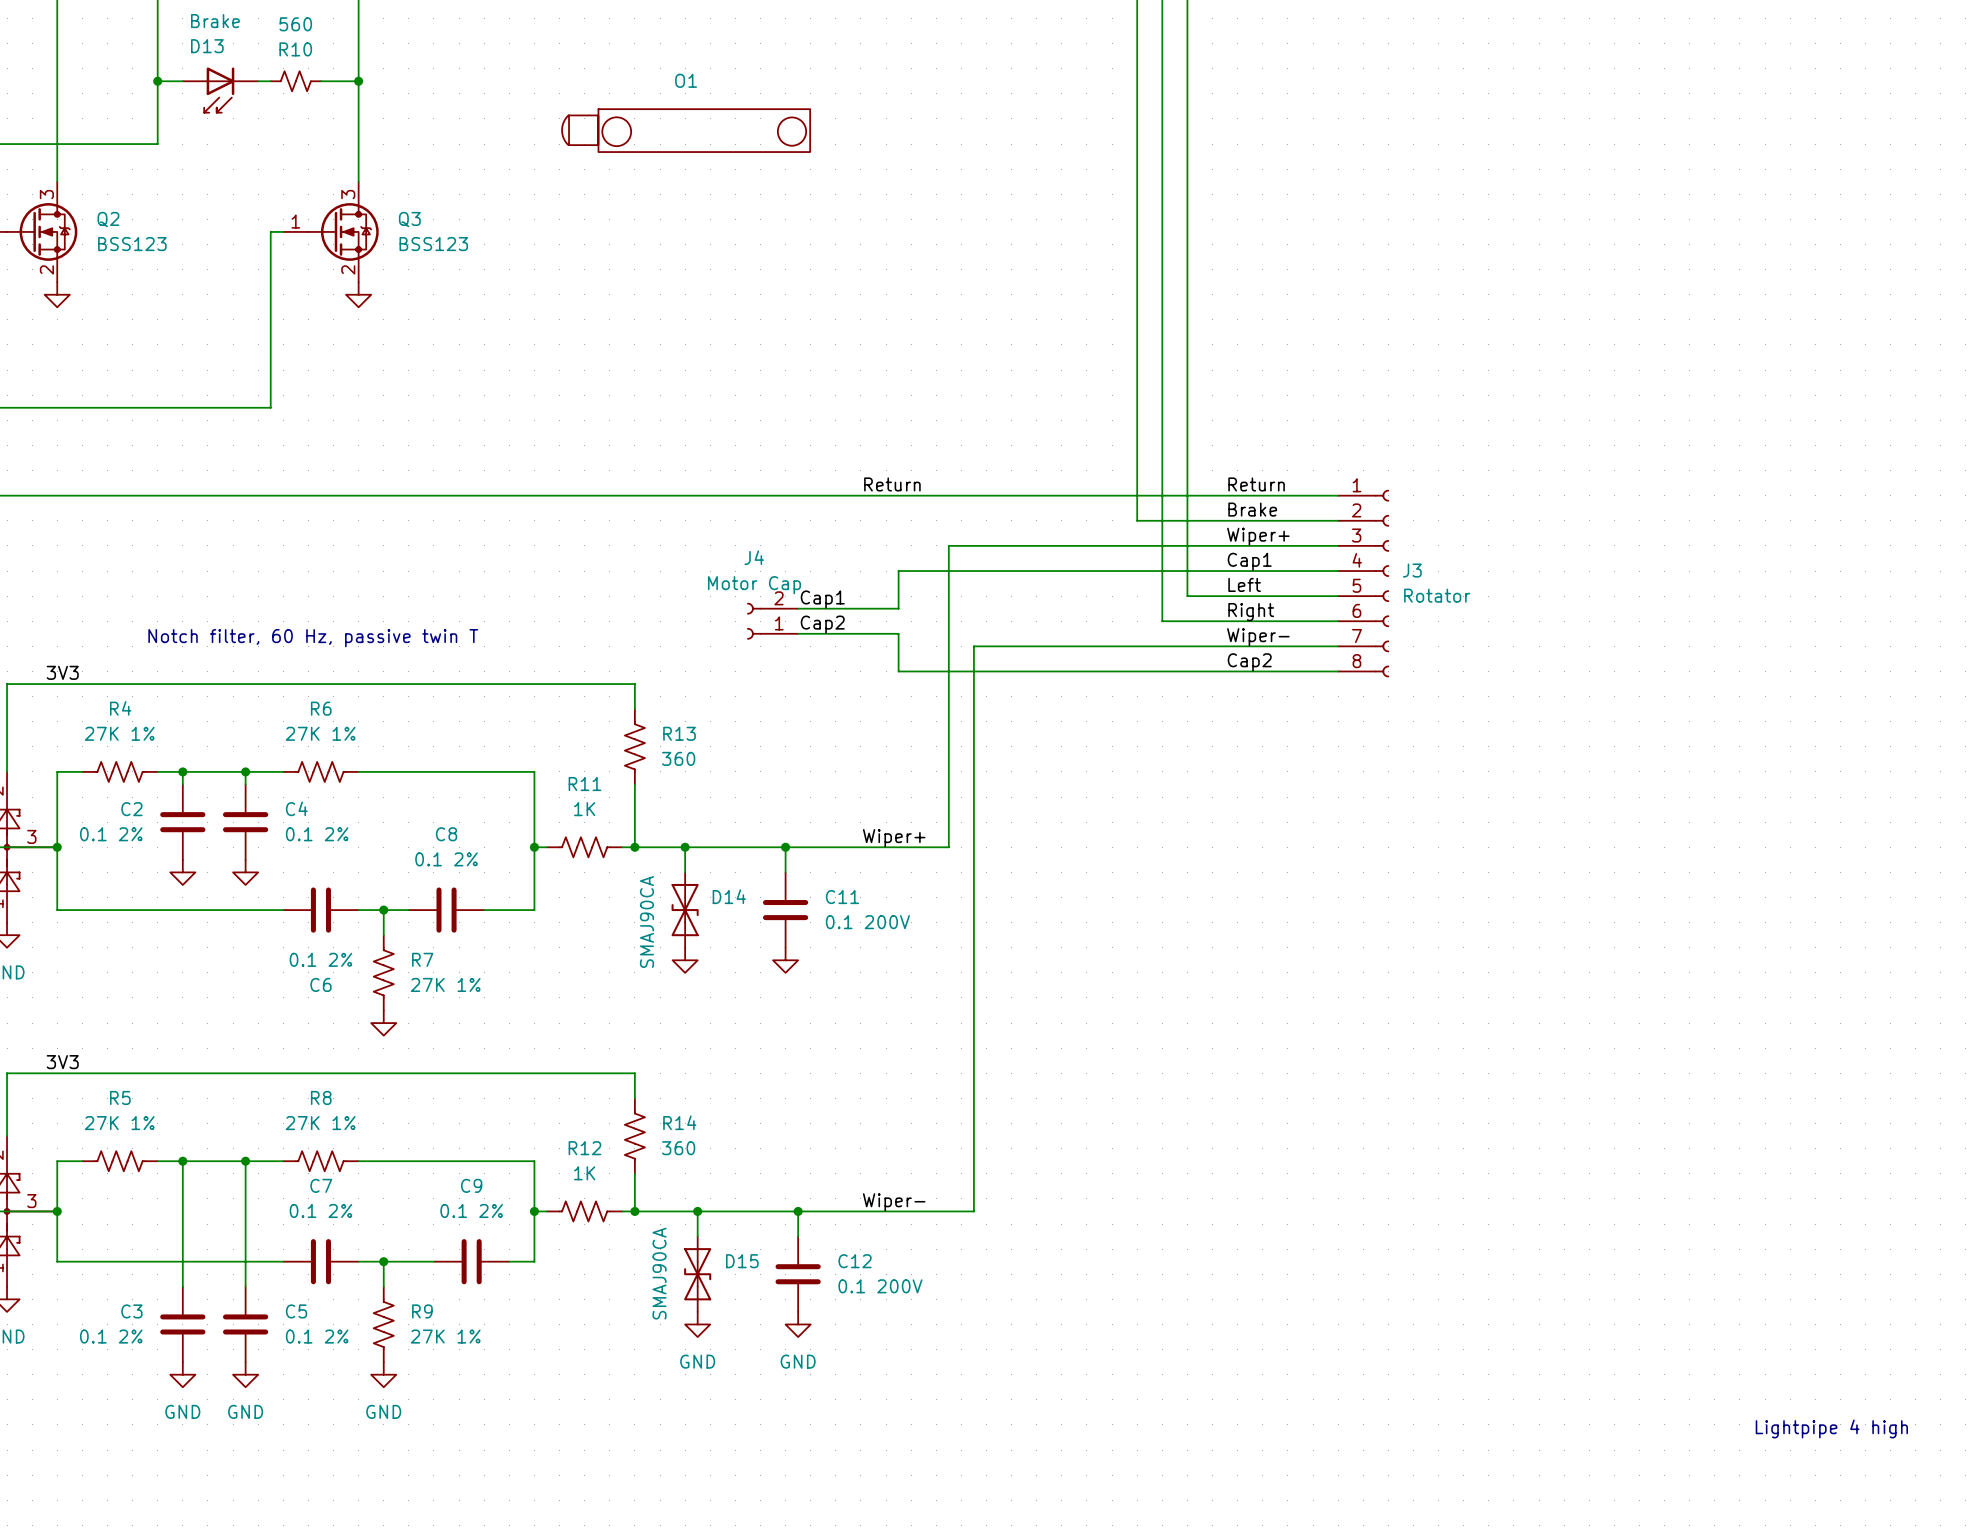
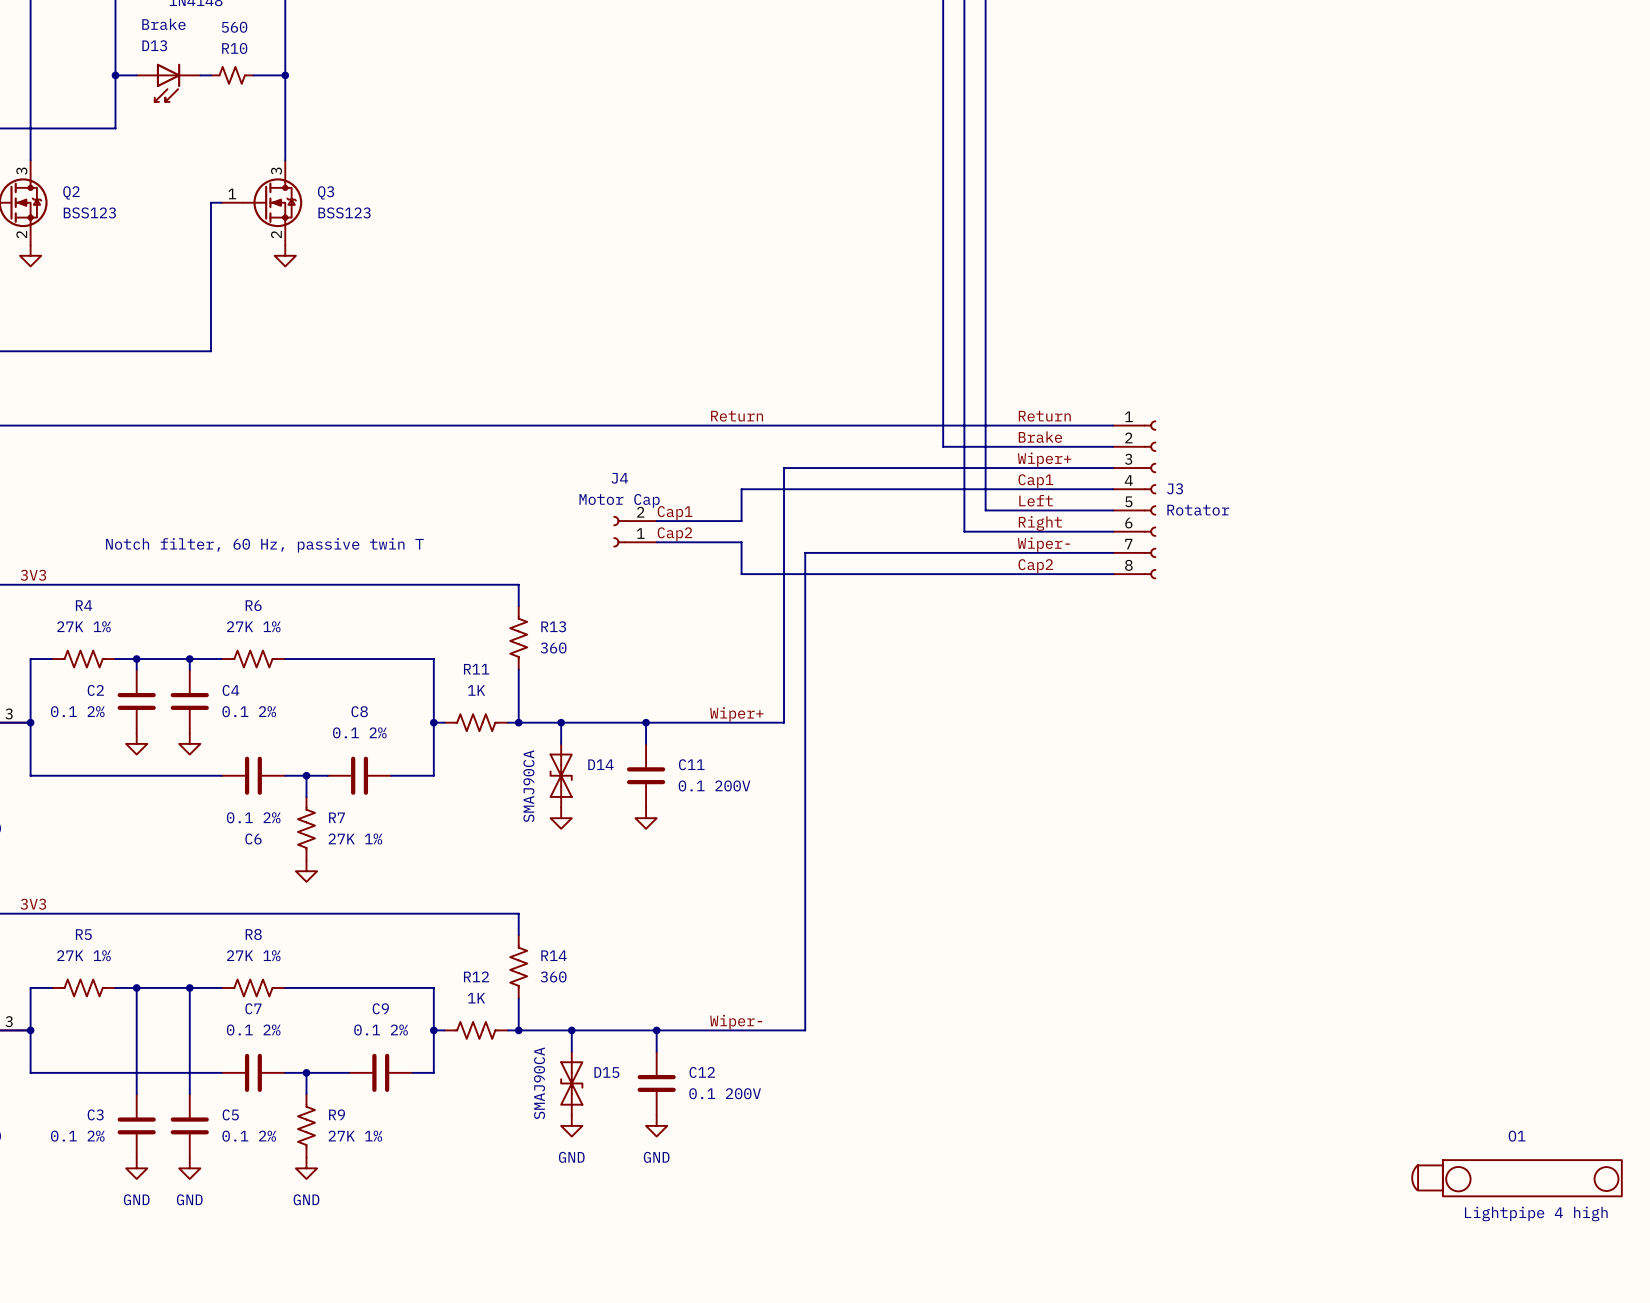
O1 position: (686, 130) -> (1517, 1178)

